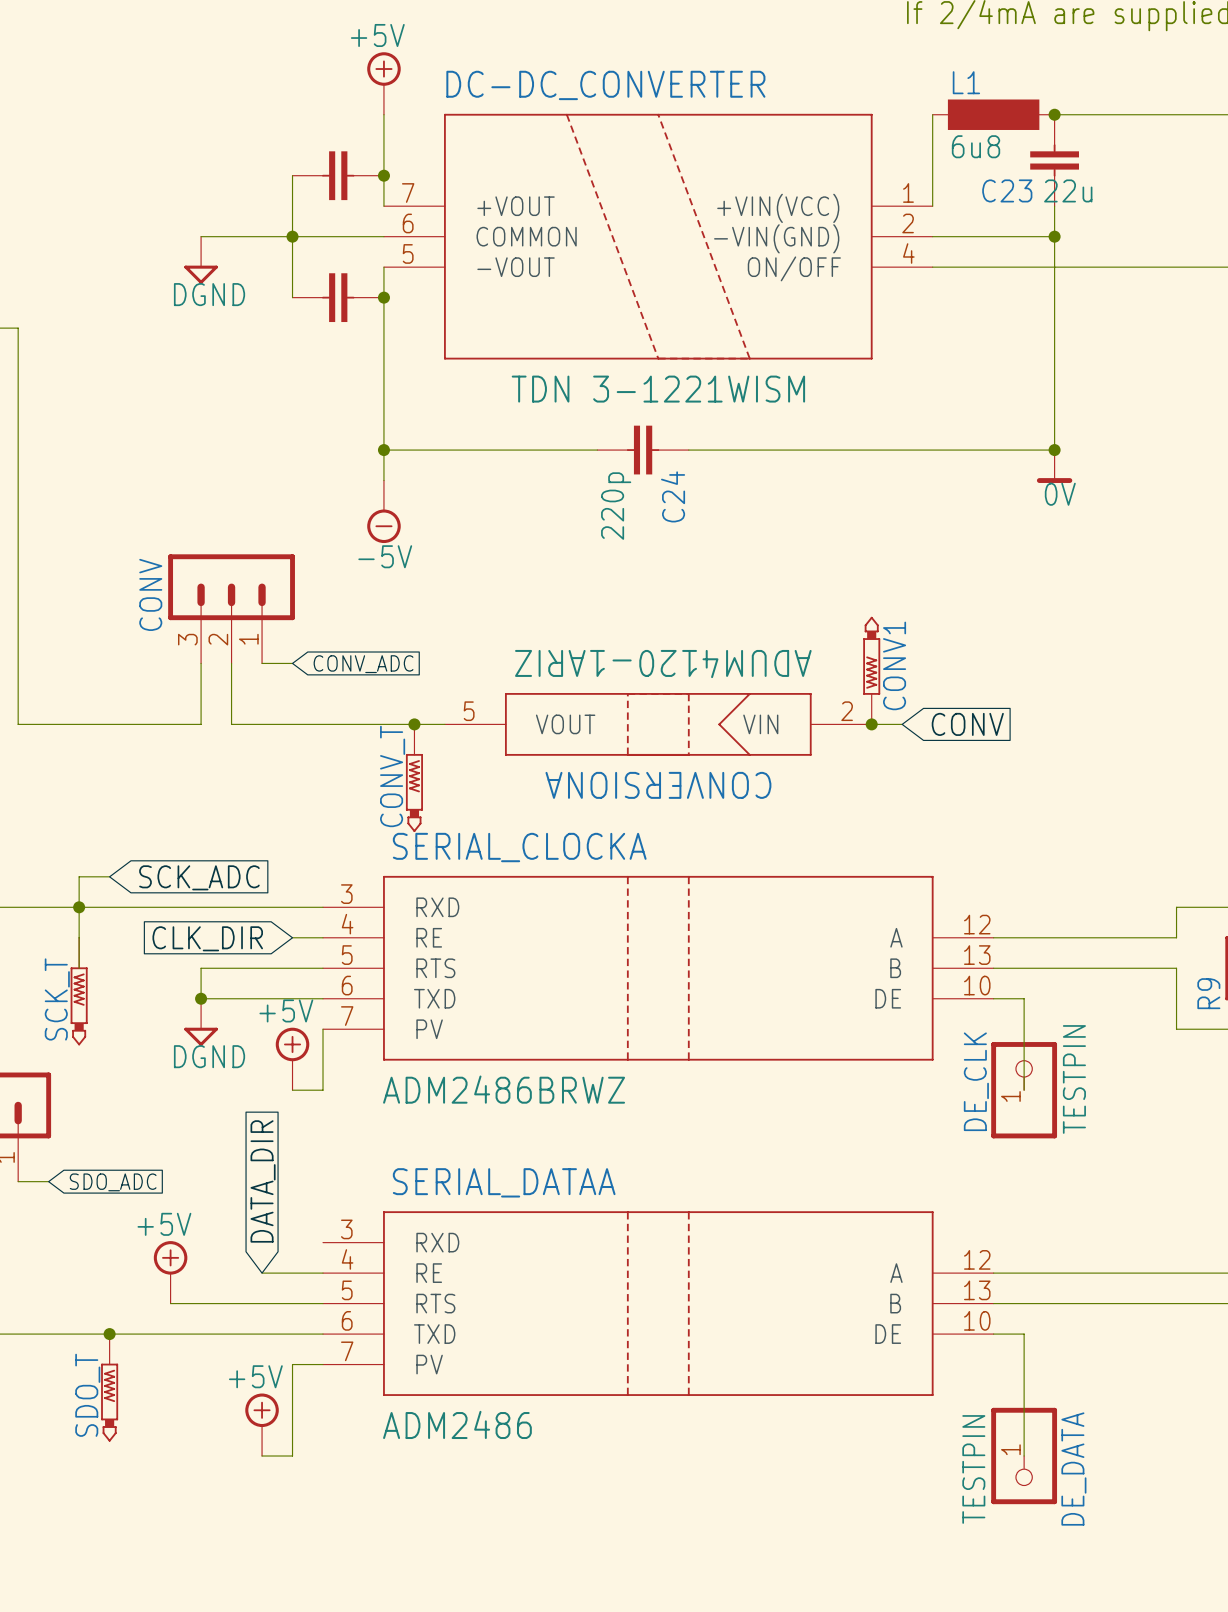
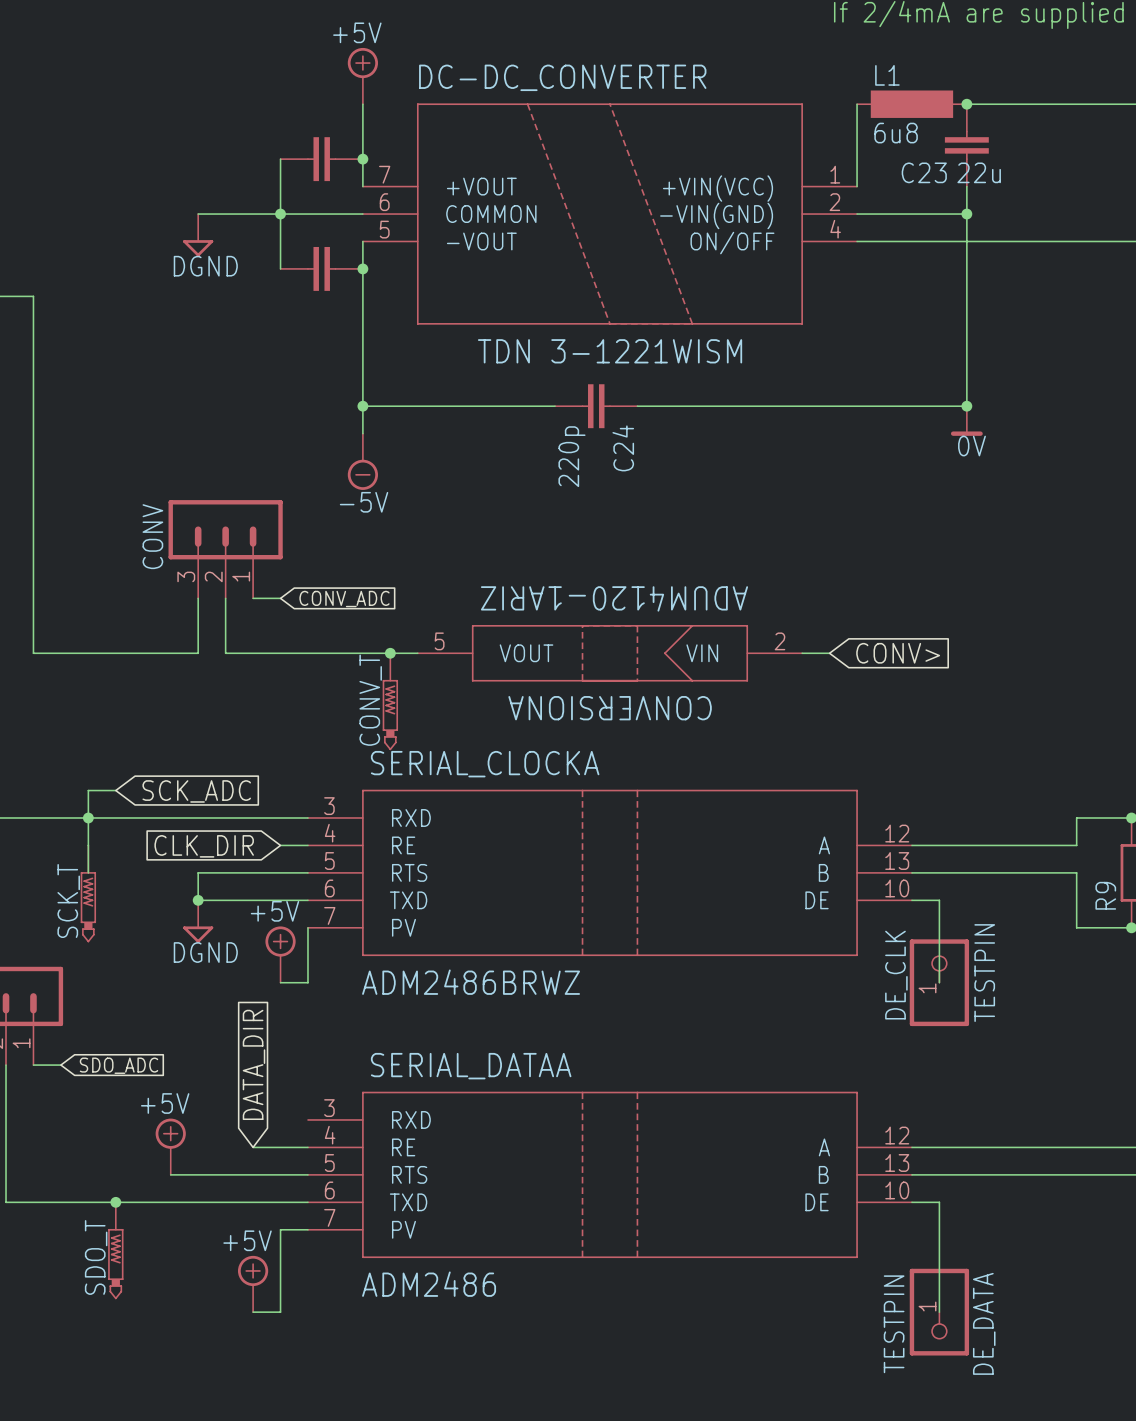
CONV1: (871, 670) -> none
junction: (871, 724) -> none
global label: CONV (967, 724) -> CONV> (898, 653)

